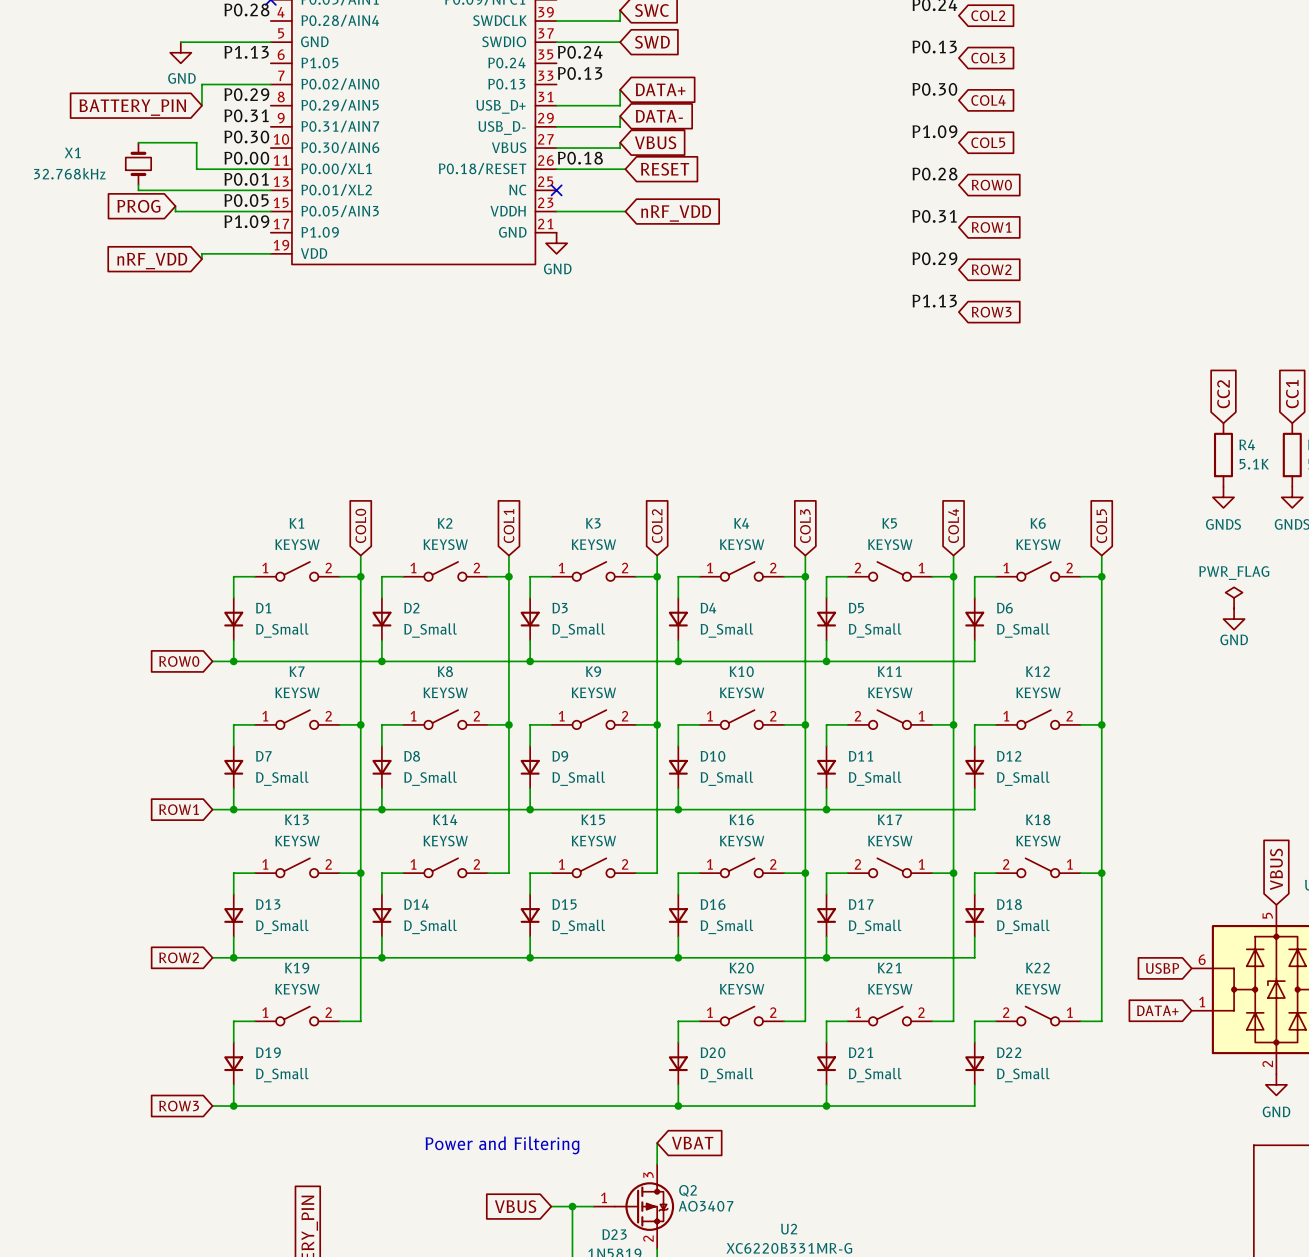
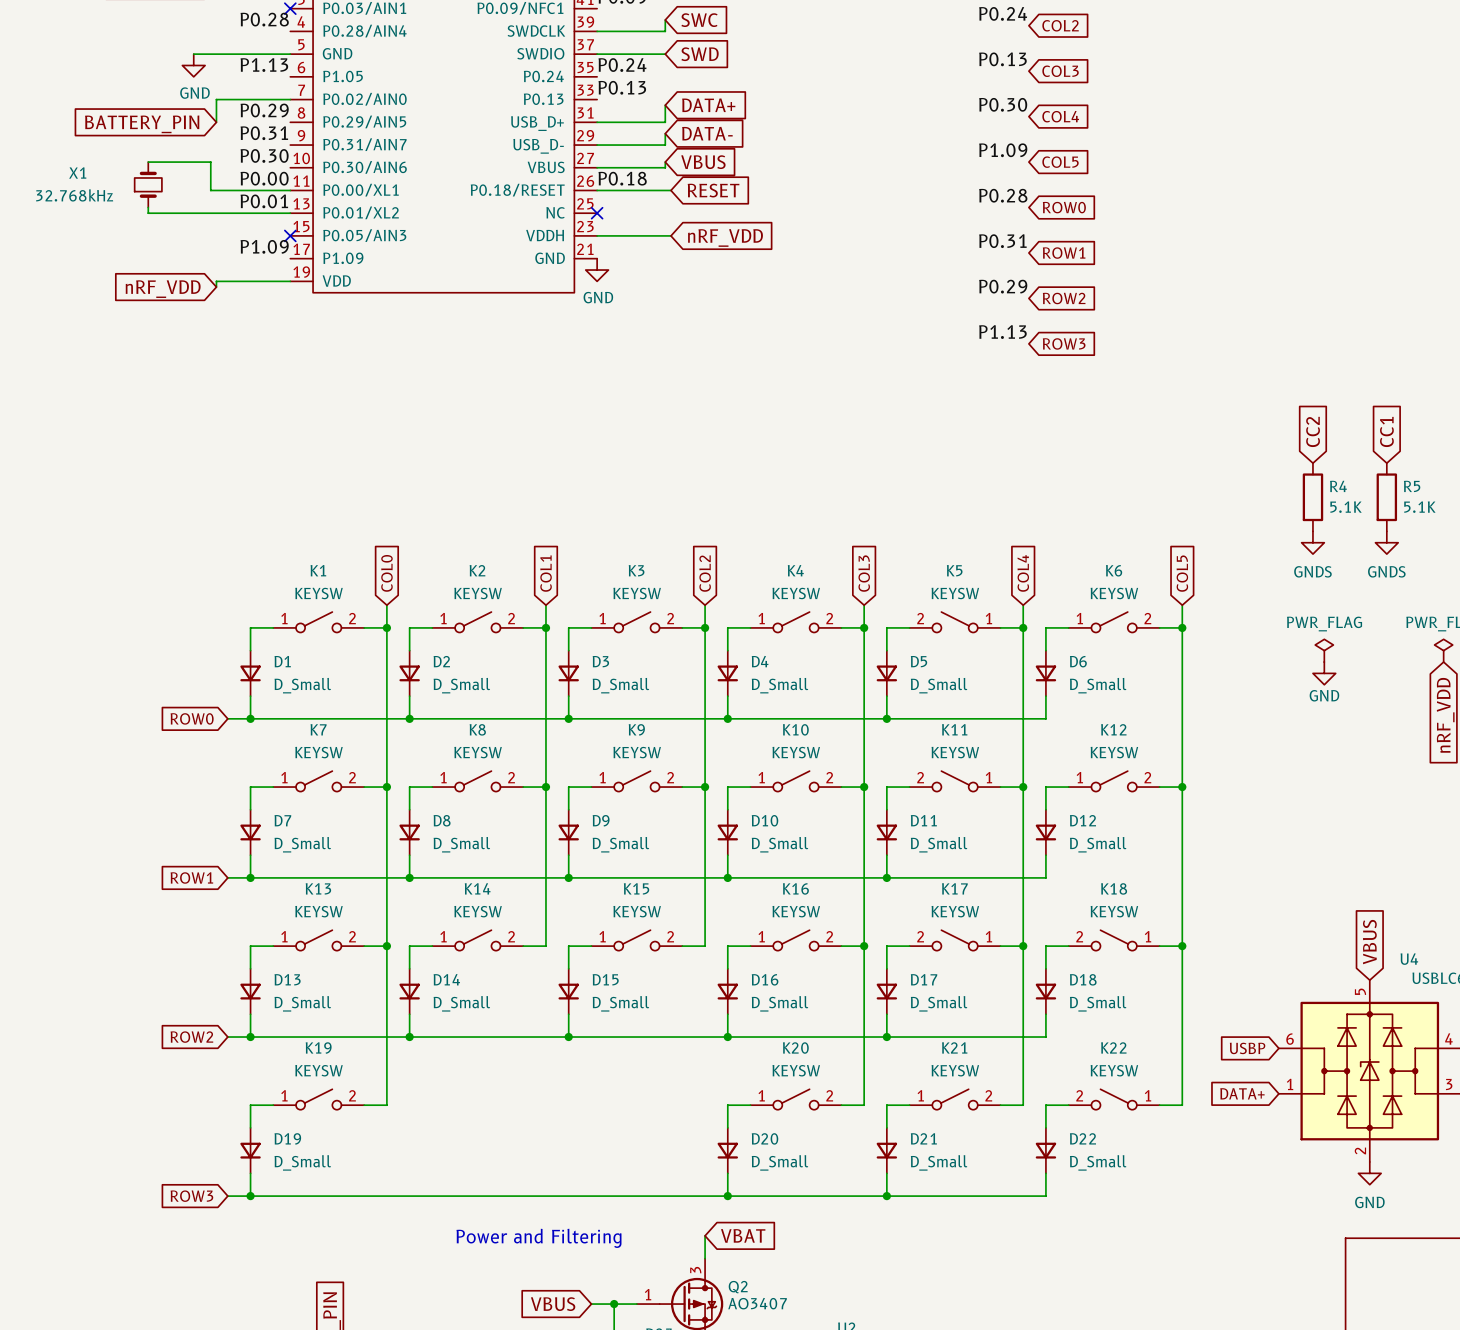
label: P0.05 (246, 200) -> none
global label: PROG (138, 206) -> none
wire: (175, 206) (175, 211) (270, 211) -> none
no-connect mark: none -> (290, 235)

